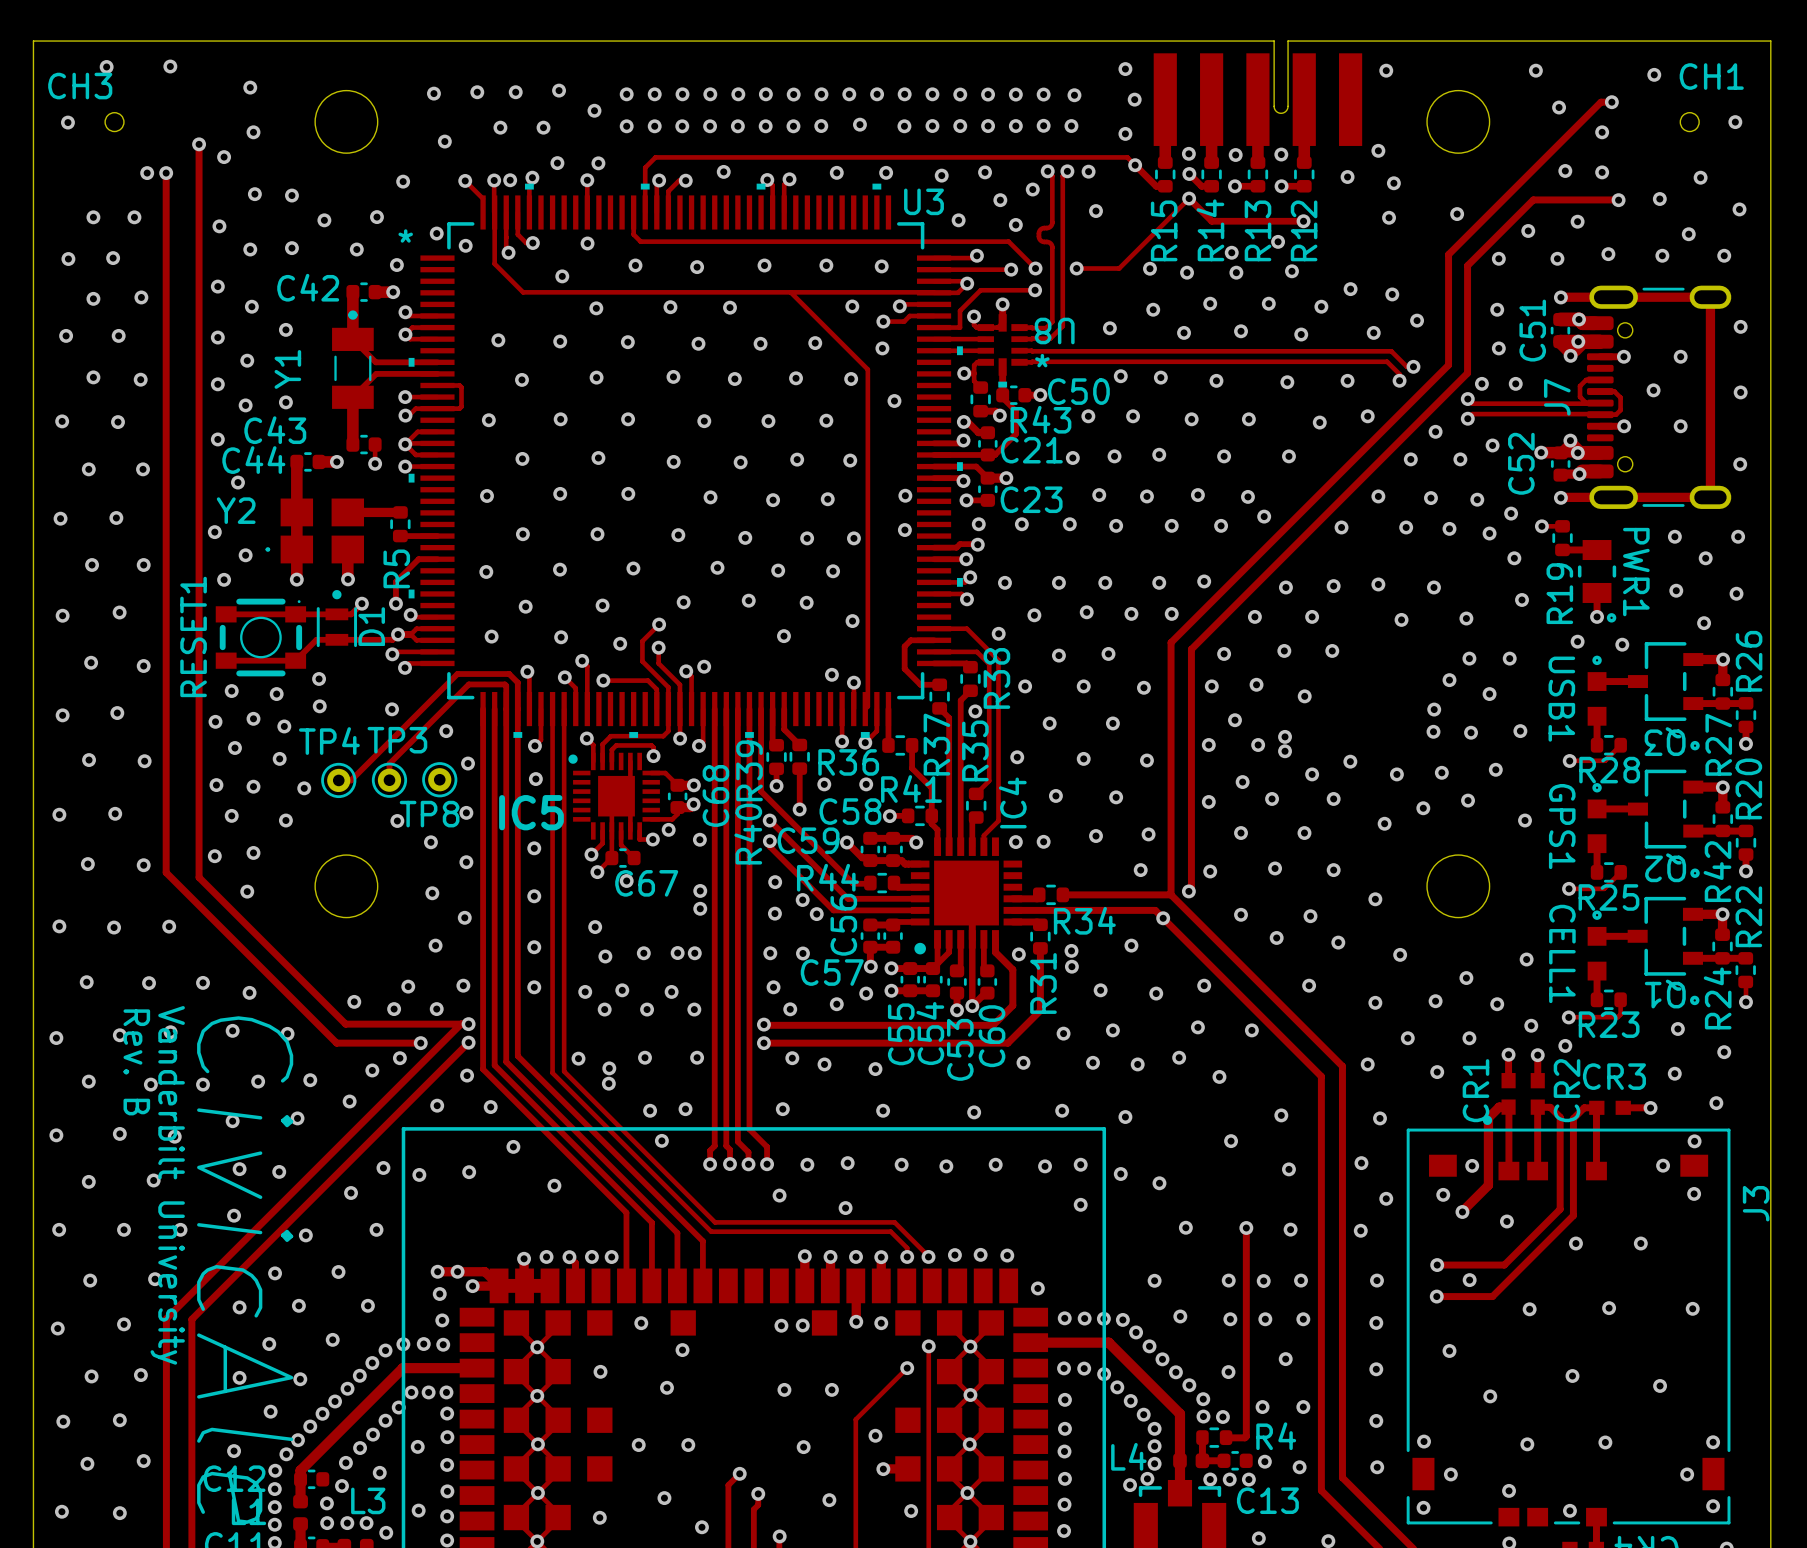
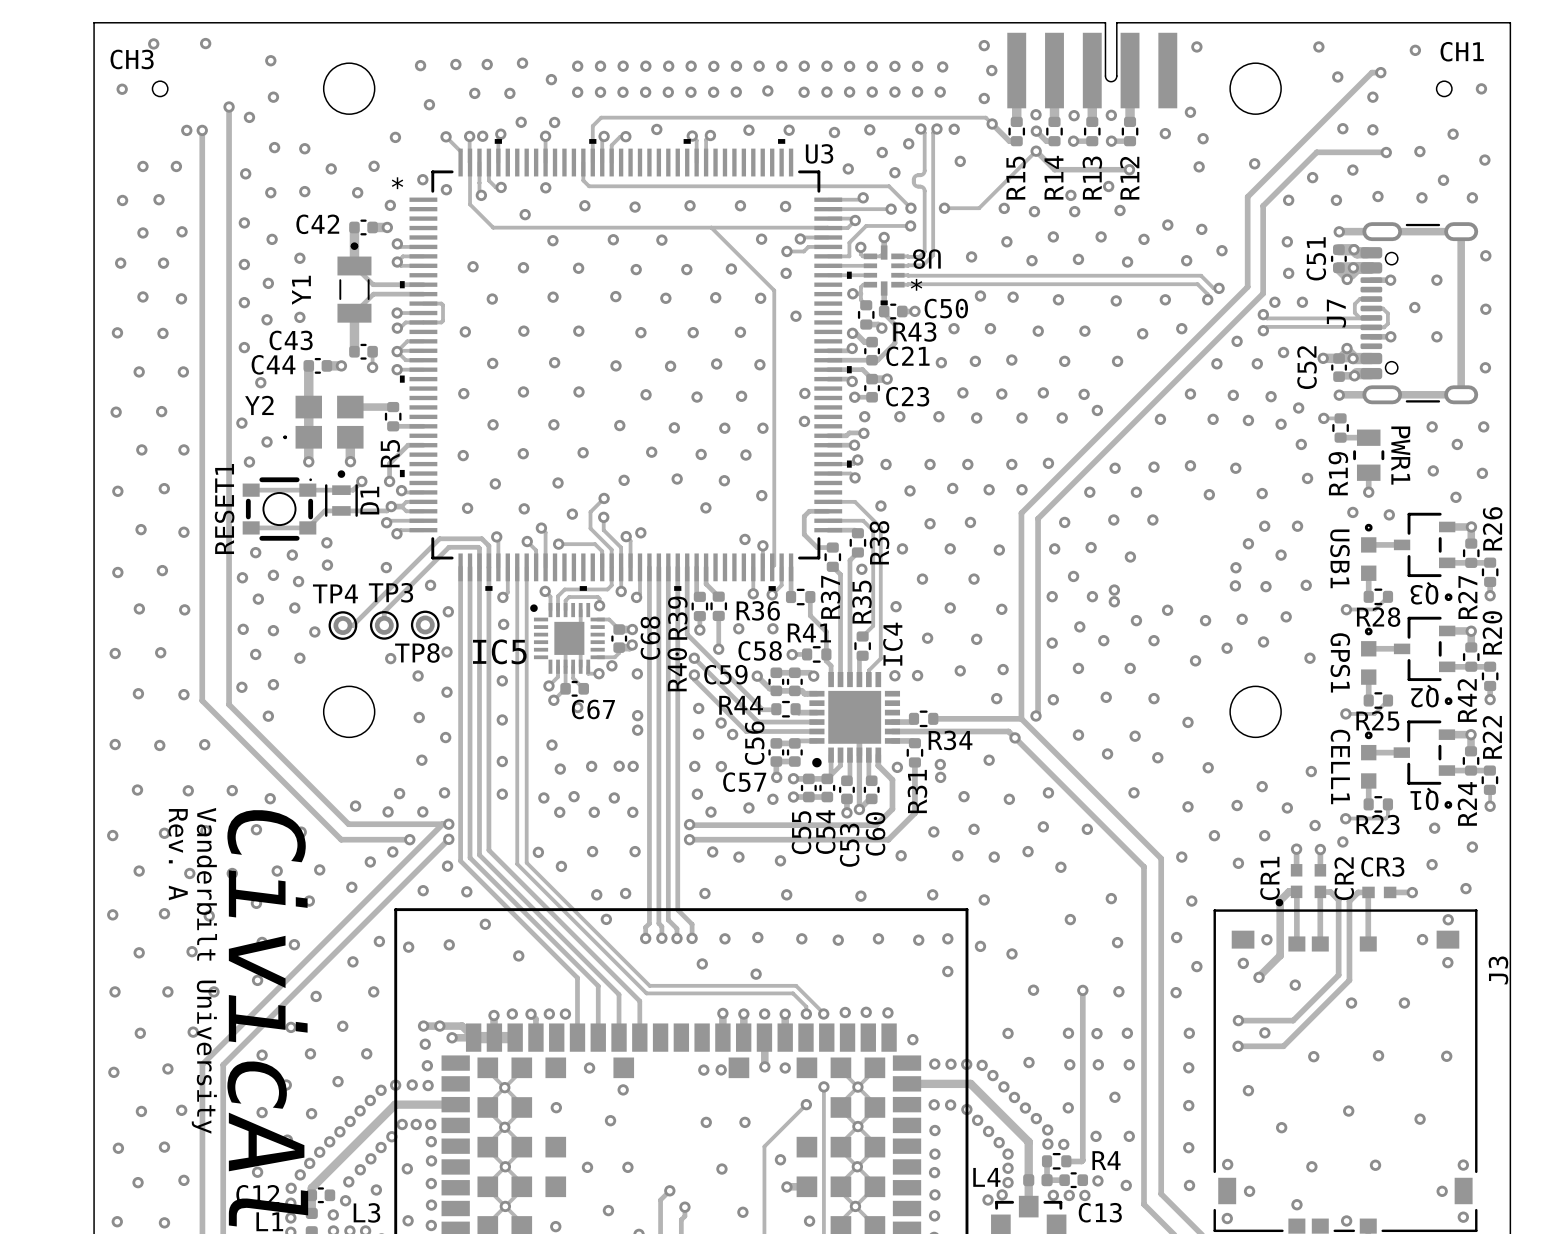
PWR1 footprint: [1577, 540, 1617, 623] -> [1353, 429, 1385, 481]
text: Rev. B (136, 1062) -> Rev. A (178, 854)
via: (609, 1068) -> none
via: none -> (561, 866)
via: (608, 1083) -> none

